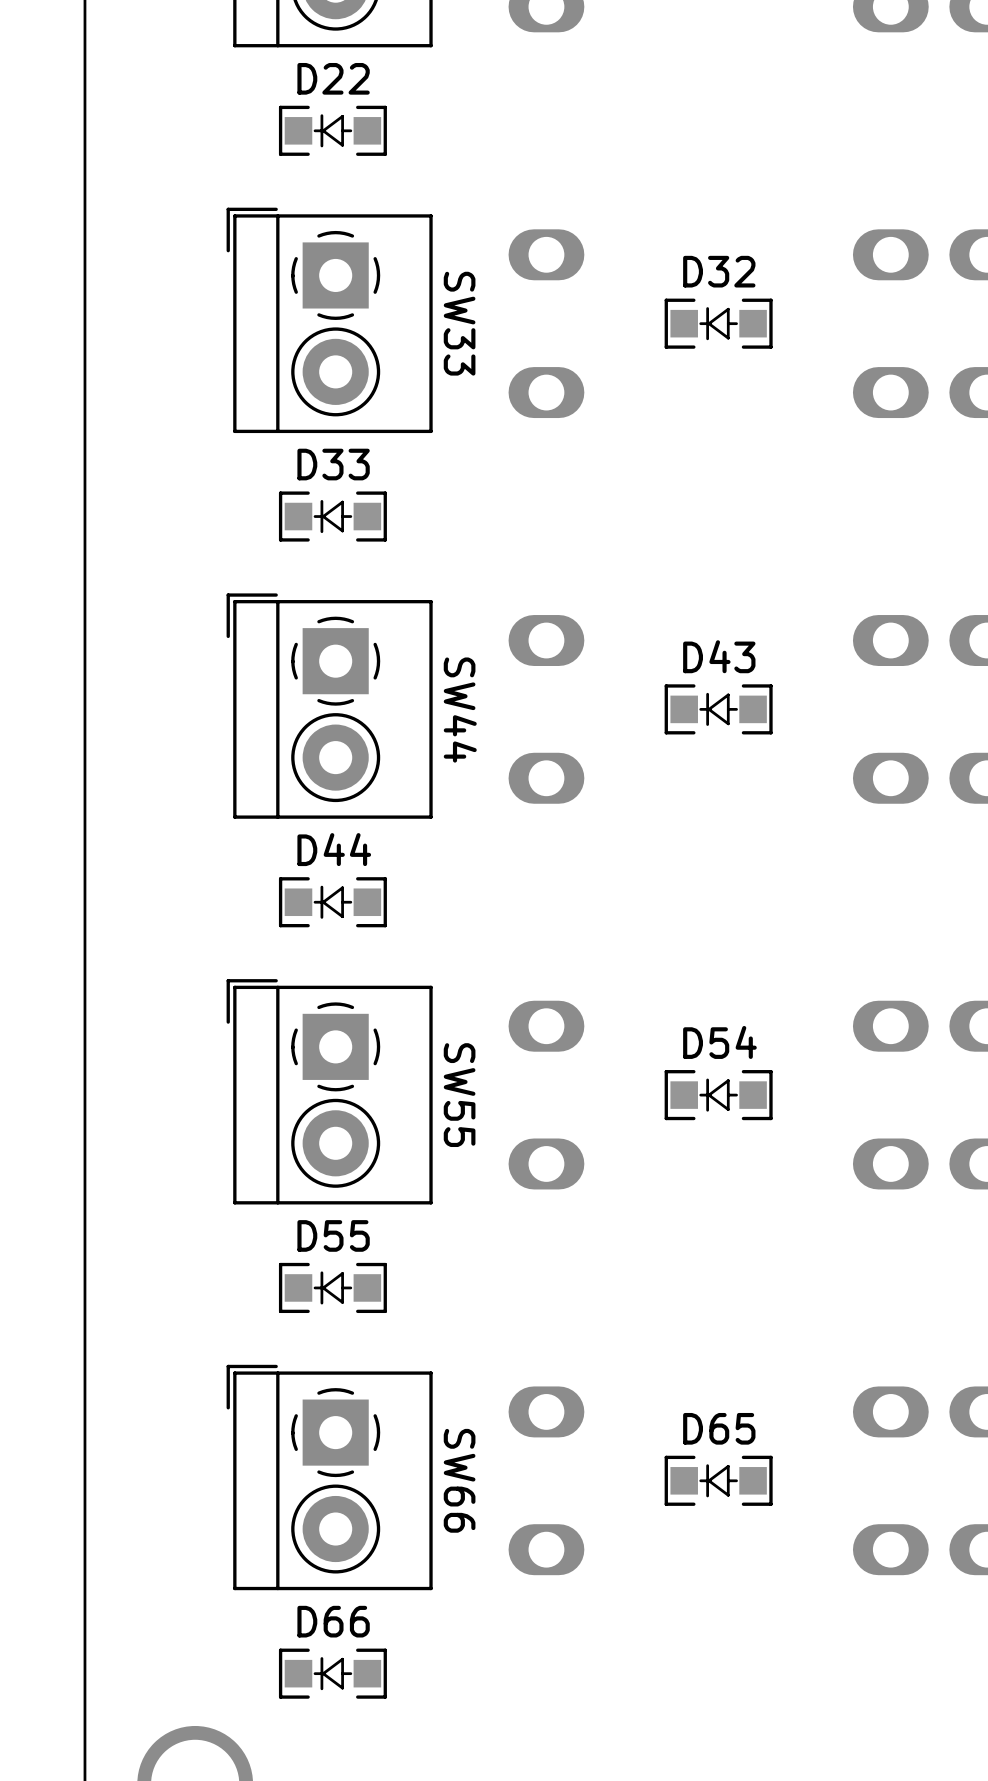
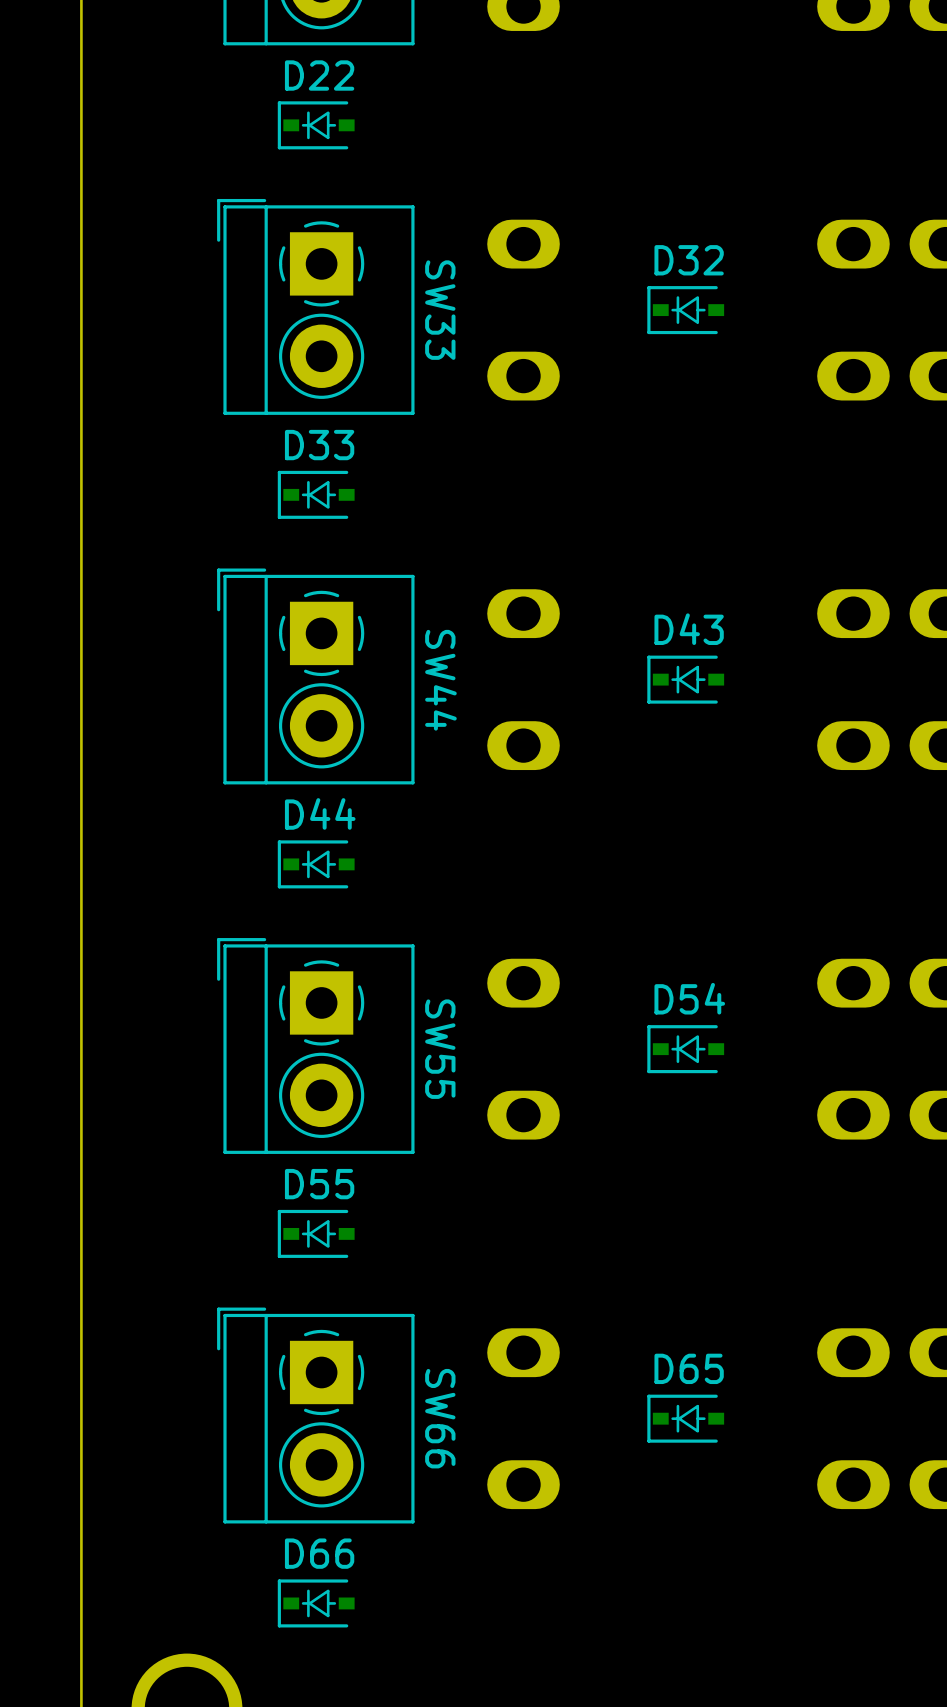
D22 footprint: [278, 105, 387, 156] -> [277, 101, 355, 150]
D32 footprint: [664, 298, 773, 349] -> [647, 286, 725, 335]
D33 footprint: [278, 491, 387, 542] -> [277, 470, 355, 519]
D43 footprint: [664, 684, 773, 735] -> [647, 655, 725, 704]
D44 footprint: [278, 877, 387, 928] -> [277, 840, 355, 889]
D54 footprint: [664, 1070, 773, 1121] -> [647, 1025, 725, 1074]
D55 footprint: [278, 1262, 387, 1314] -> [277, 1209, 355, 1258]
D65 footprint: [664, 1455, 773, 1506] -> [647, 1394, 725, 1443]
D66 footprint: [278, 1648, 387, 1699] -> [277, 1579, 355, 1628]

